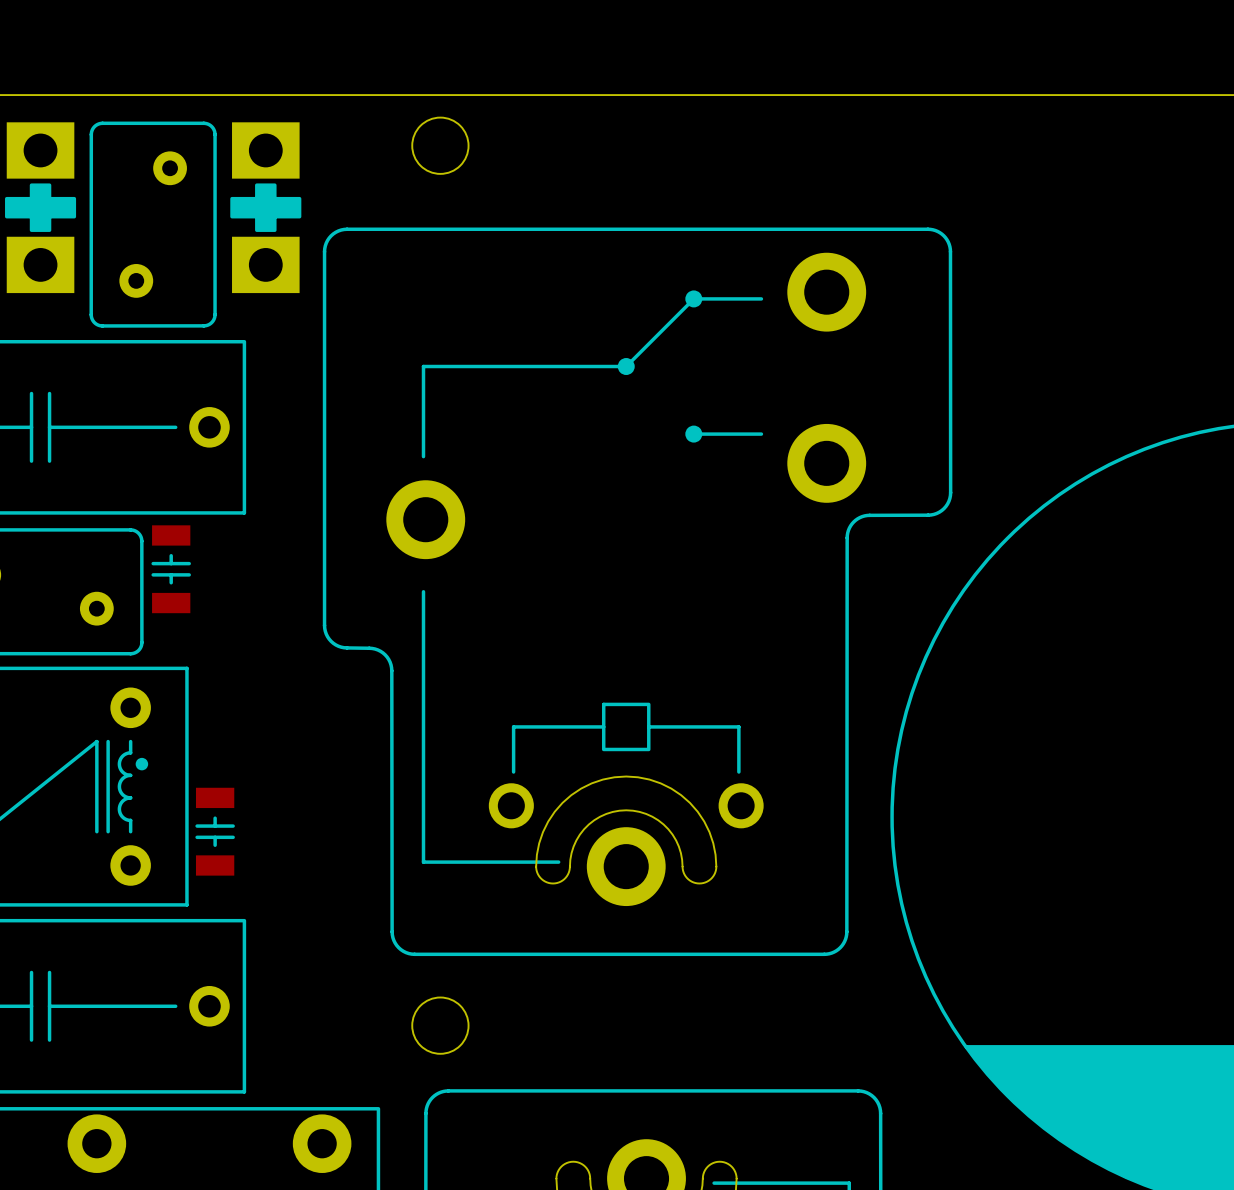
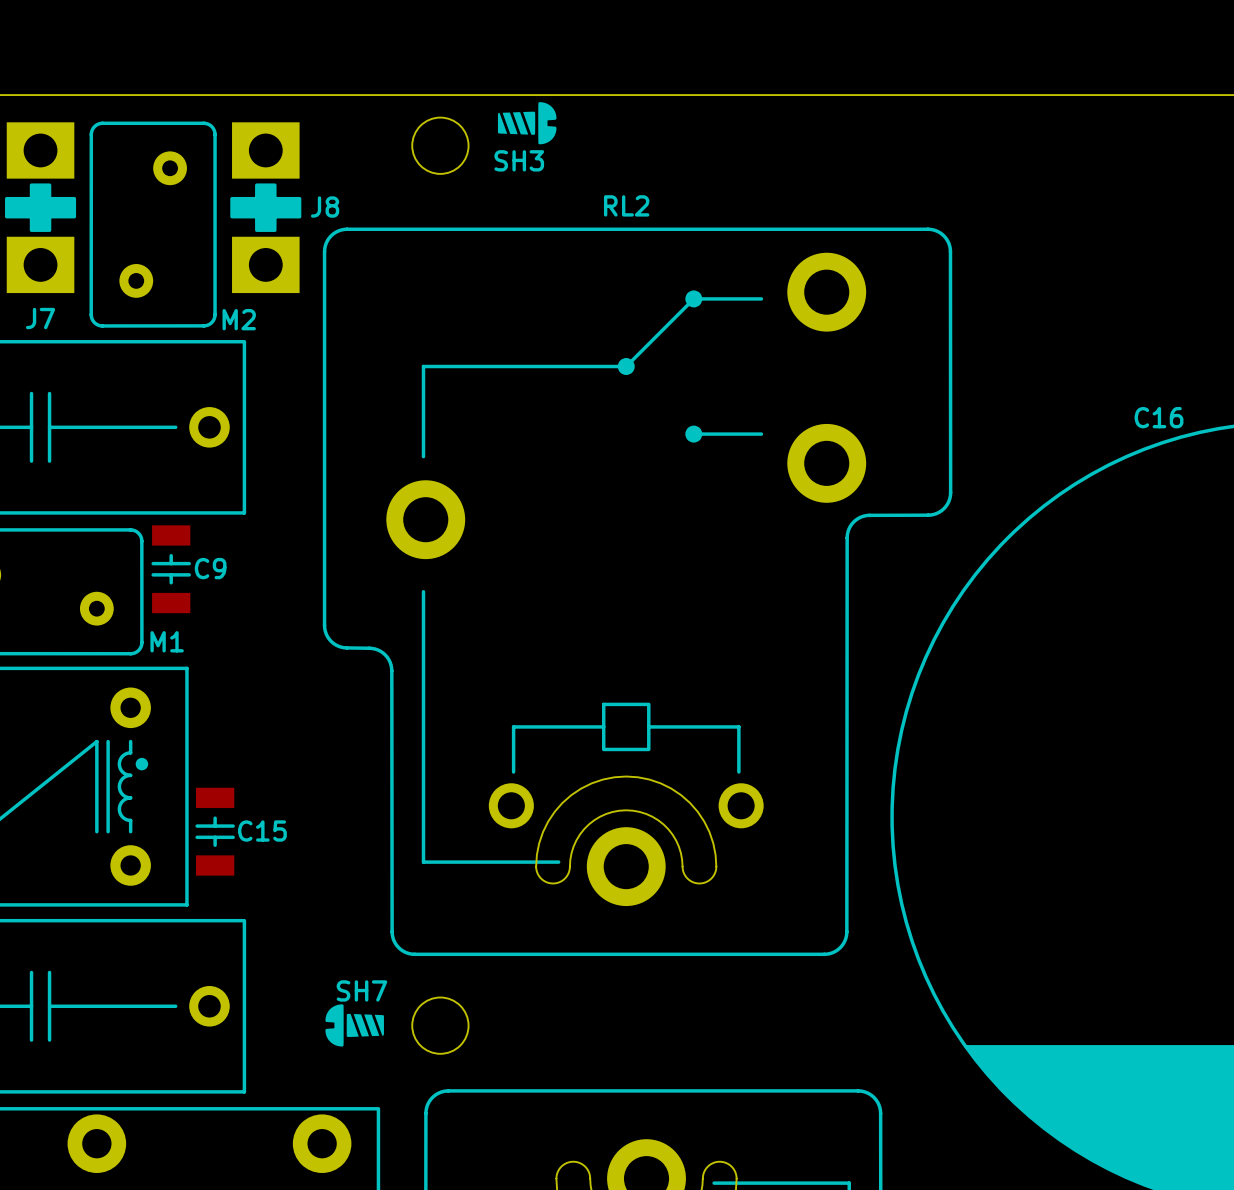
drawing: none -> [497, 102, 557, 145]
SH3 name: none -> SH3 (519, 160)
RL2 name: none -> RL2 (626, 205)
J8 name: none -> J8 (325, 207)
J7 name: none -> J7 (40, 318)
M2 name: none -> M2 (239, 319)
C16 name: none -> C16 (1159, 417)
C9 name: none -> C9 (210, 568)
M1 name: none -> M1 (167, 641)
C15 name: none -> C15 (262, 831)
SH7 name: none -> SH7 (361, 990)
drawing: none -> [325, 1004, 384, 1047]

